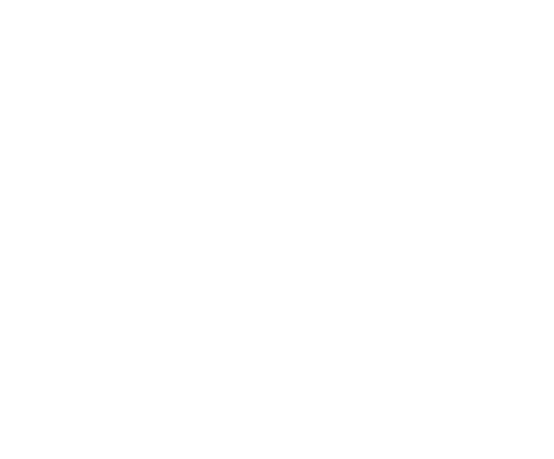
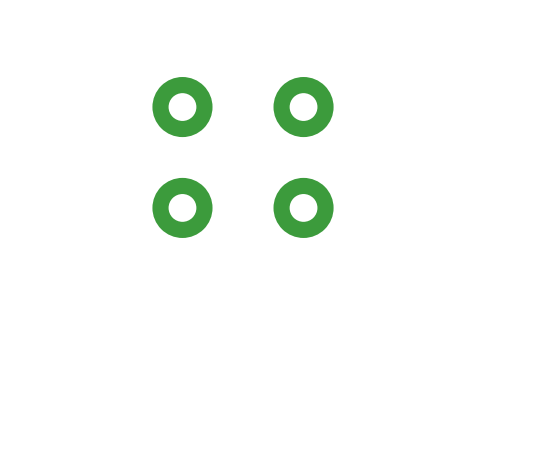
via: none -> (182, 107)
via: none -> (303, 107)
via: none -> (182, 207)
via: none -> (303, 207)

